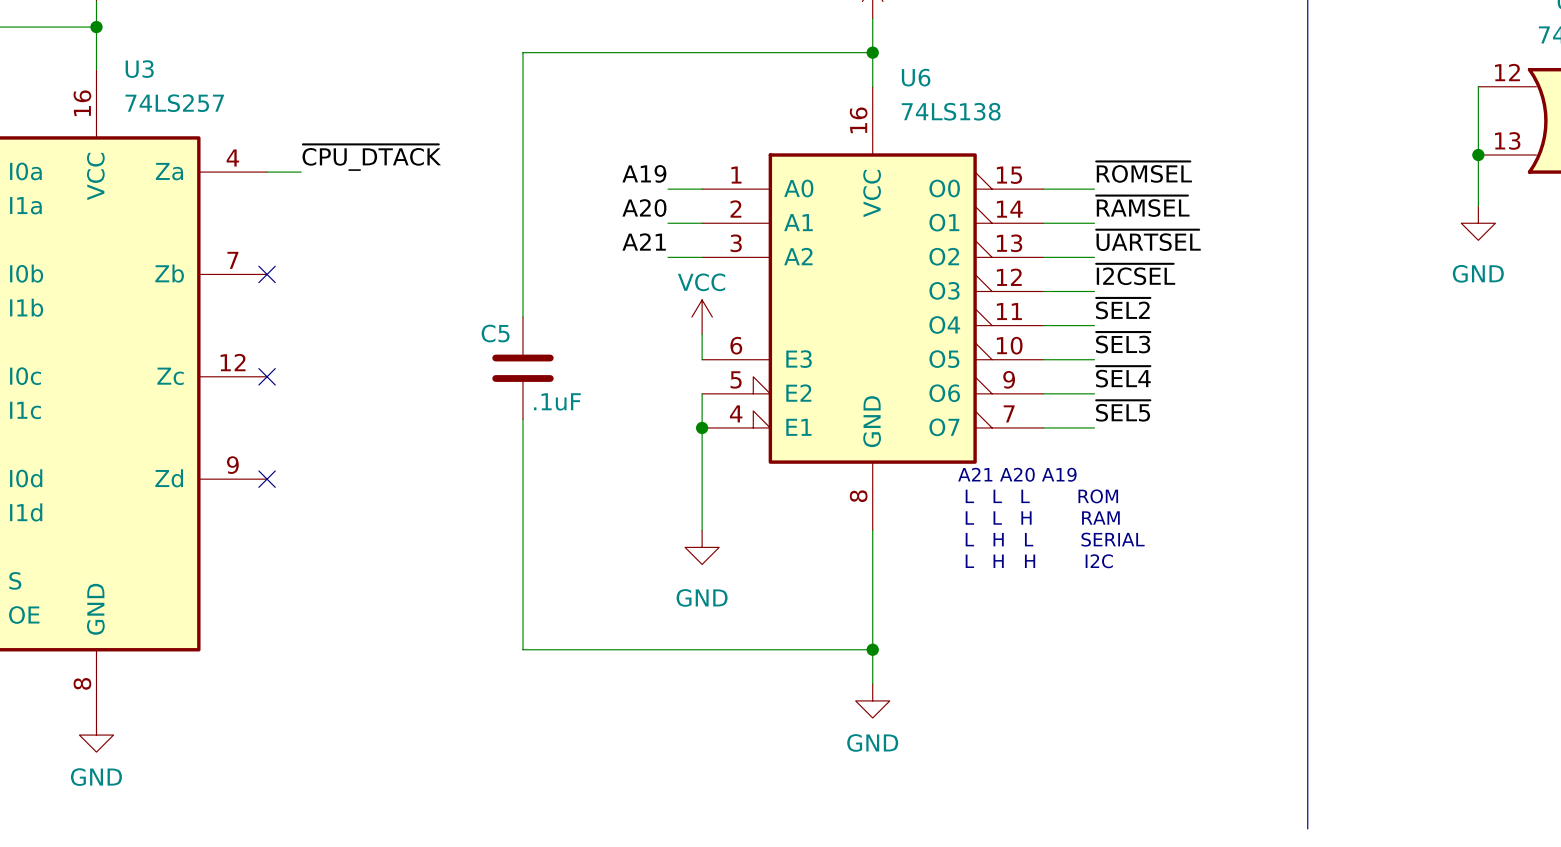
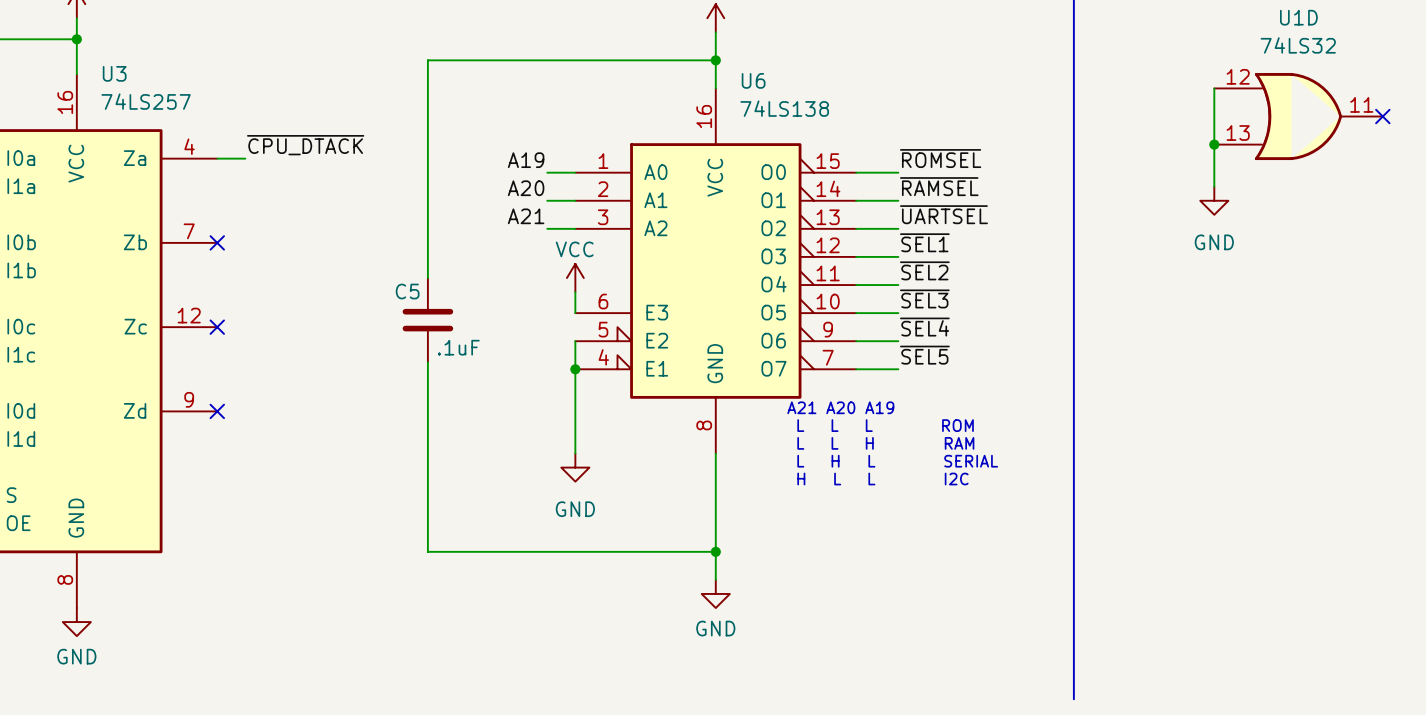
label: ~{I2CSEL} (1135, 274) -> ~{SEL1} (924, 242)
text: L H H I2C (1039, 561) -> H L L I2C (882, 479)

